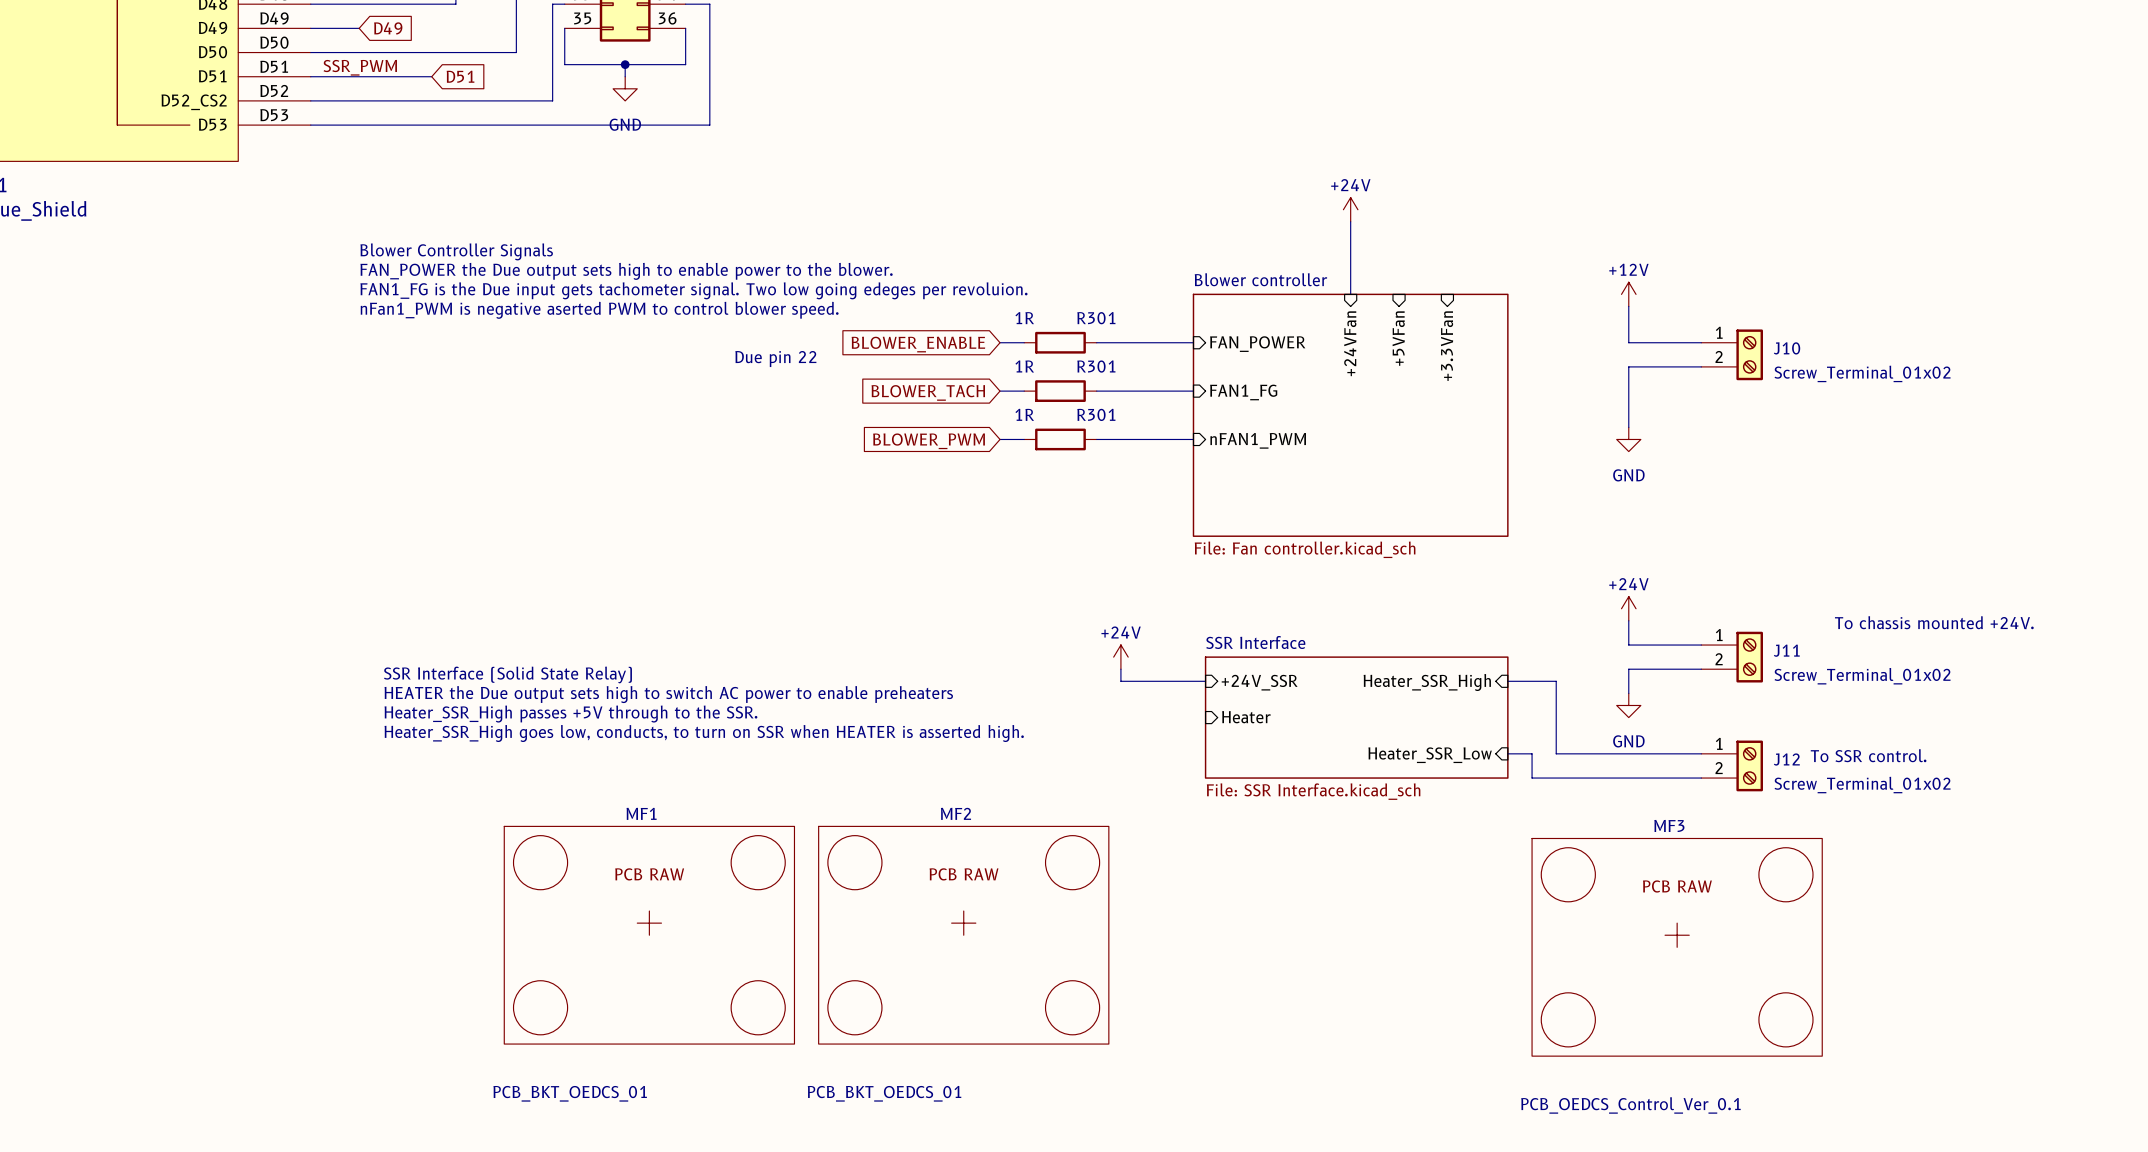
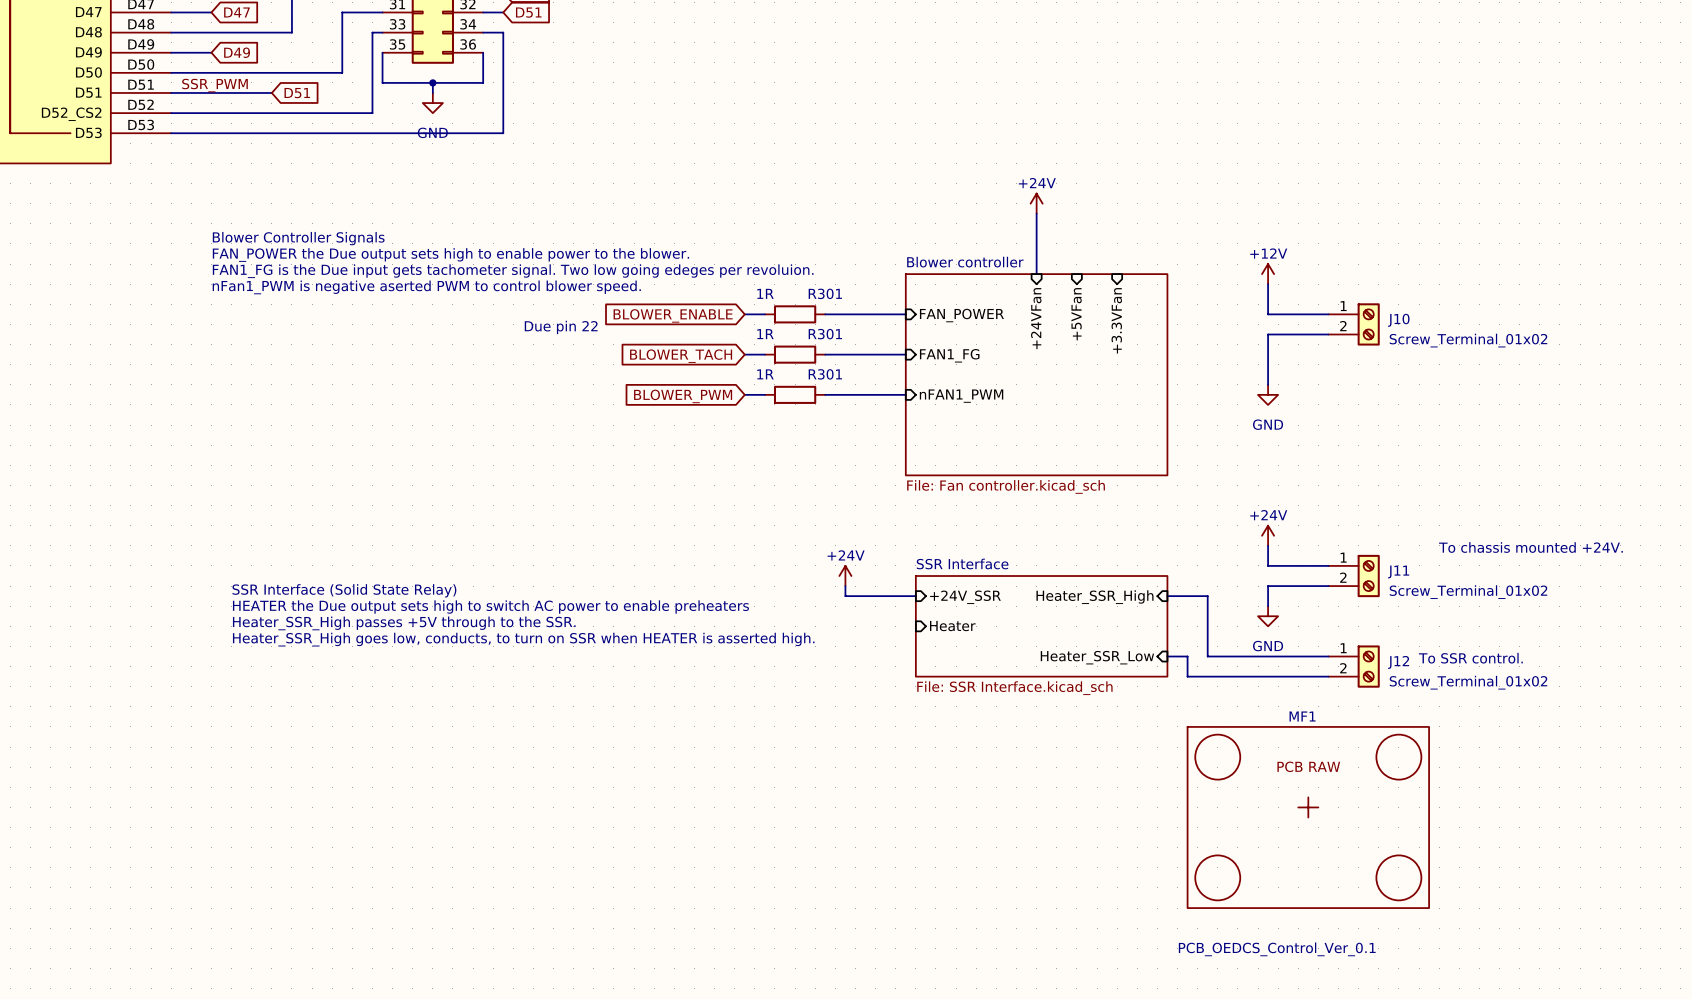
MF3 name: MF3 (1669, 825) -> MF1 (1302, 716)
MF1: PCB_BKT_OEDCS_01 (649, 935) -> none
MF2: PCB_BKT_OEDCS_01 (963, 935) -> none

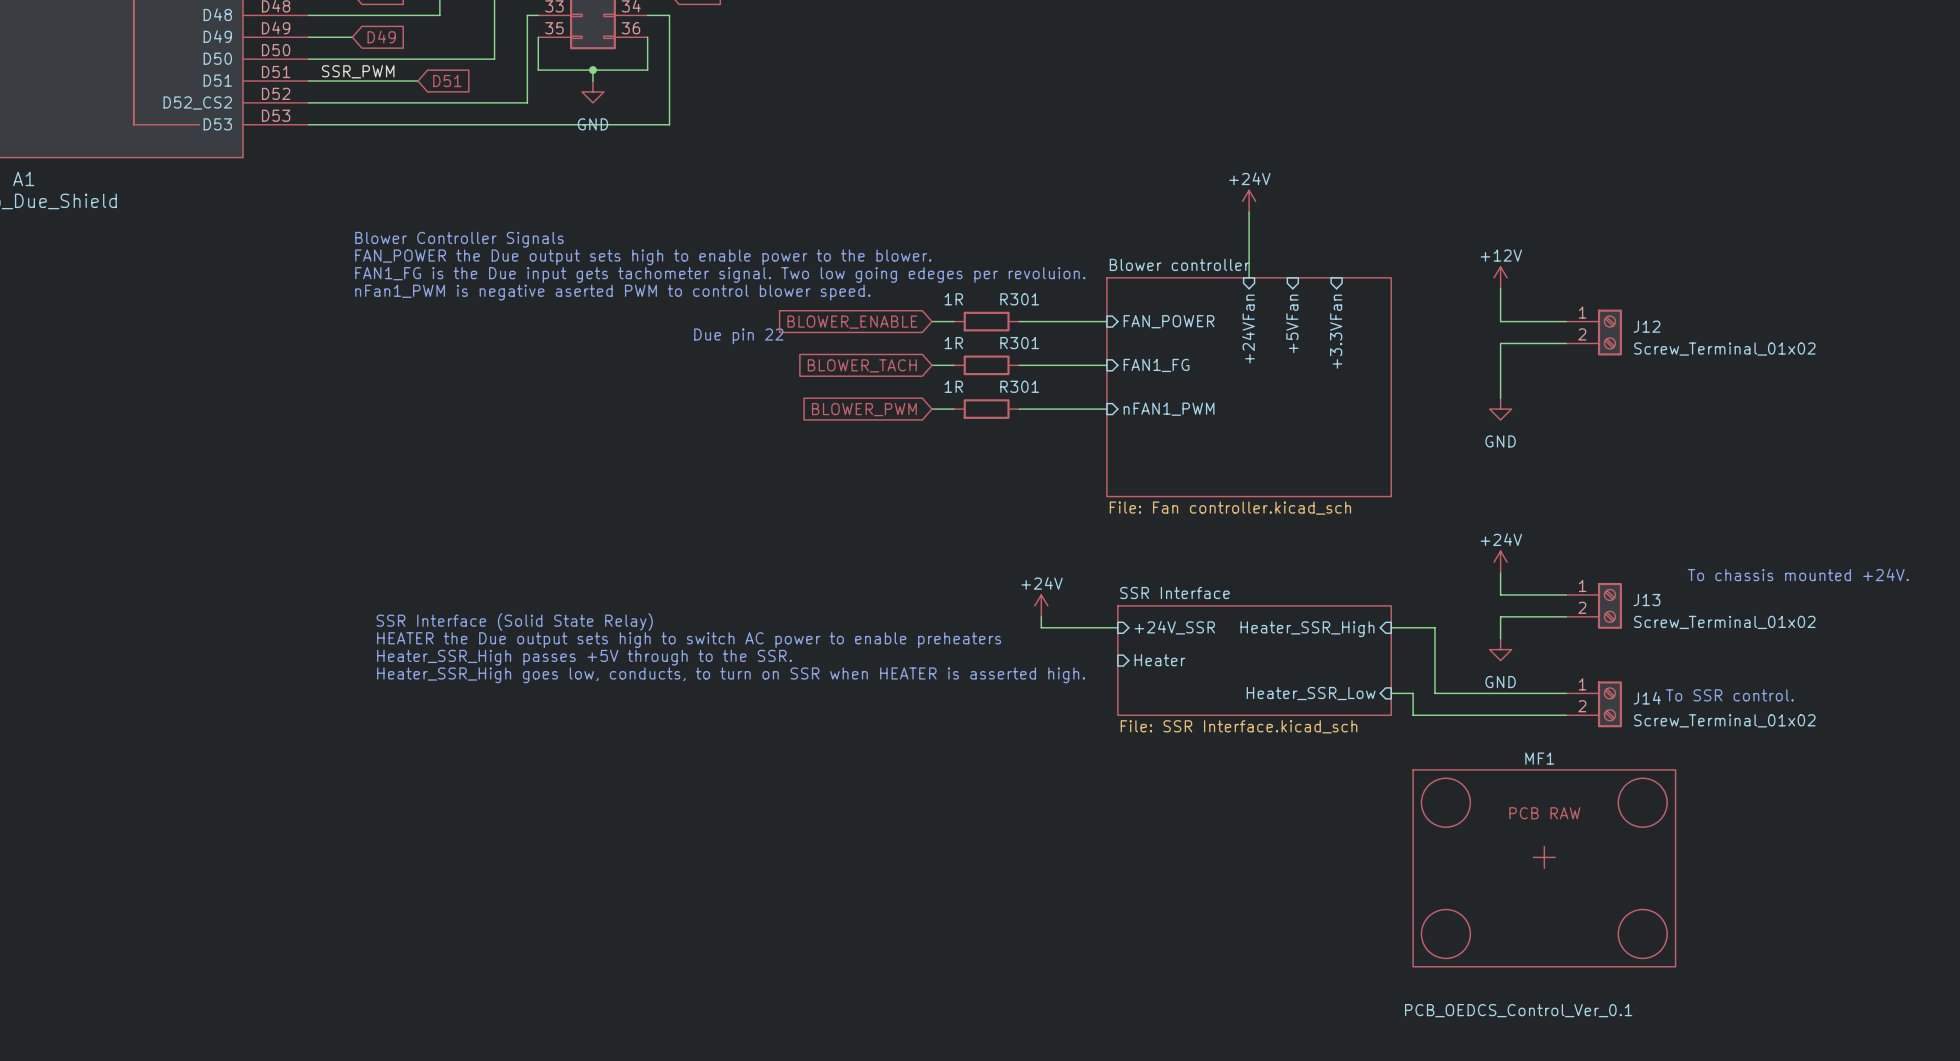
J10 name: J10 (1398, 320) -> J12 (1647, 326)
J11 name: J11 (1398, 571) -> J13 (1647, 600)
J12 name: J12 (1398, 662) -> J14 (1647, 698)

